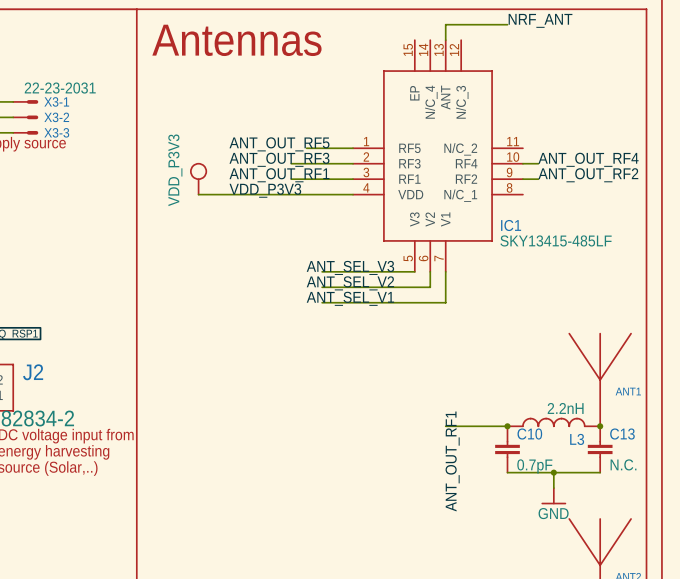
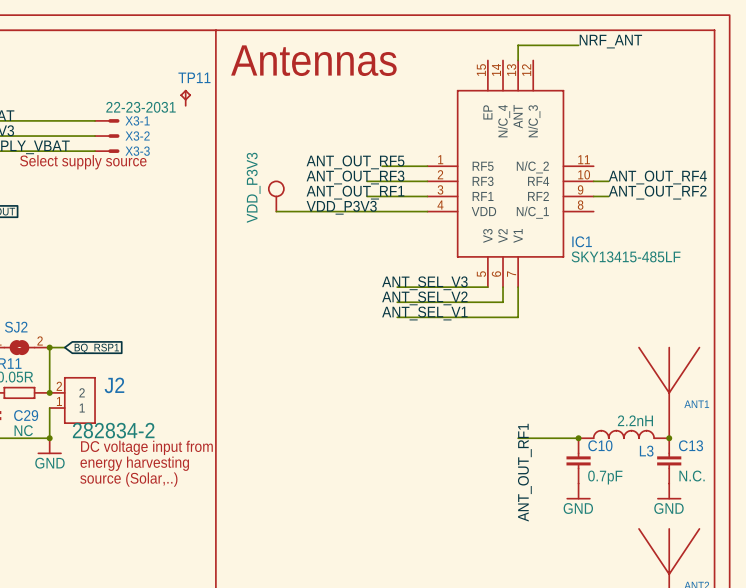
TP11: none -> (185, 97)
wire: (507, 472) (600, 472) -> none
wire: (553, 472) (553, 488) -> none
junction: (553, 472) -> none
power symbol: none -> GND (578, 491)
power symbol: none -> GND (669, 491)
power symbol: GND (553, 496) -> none

